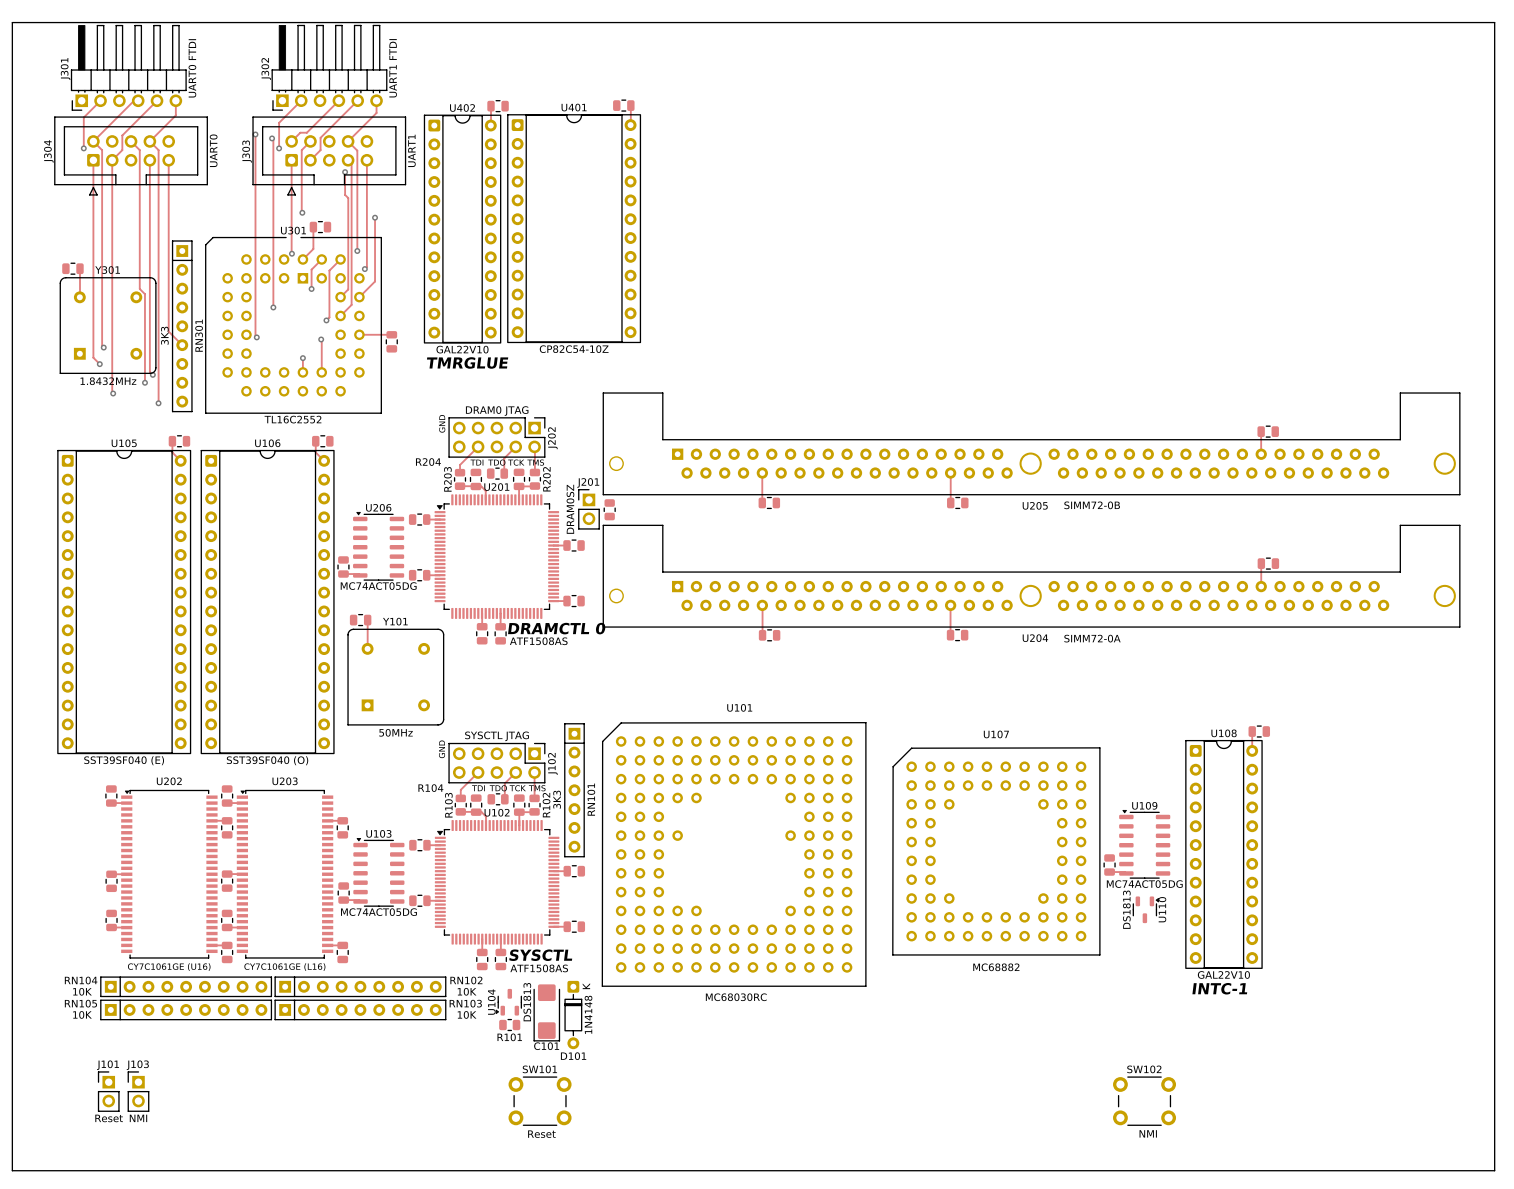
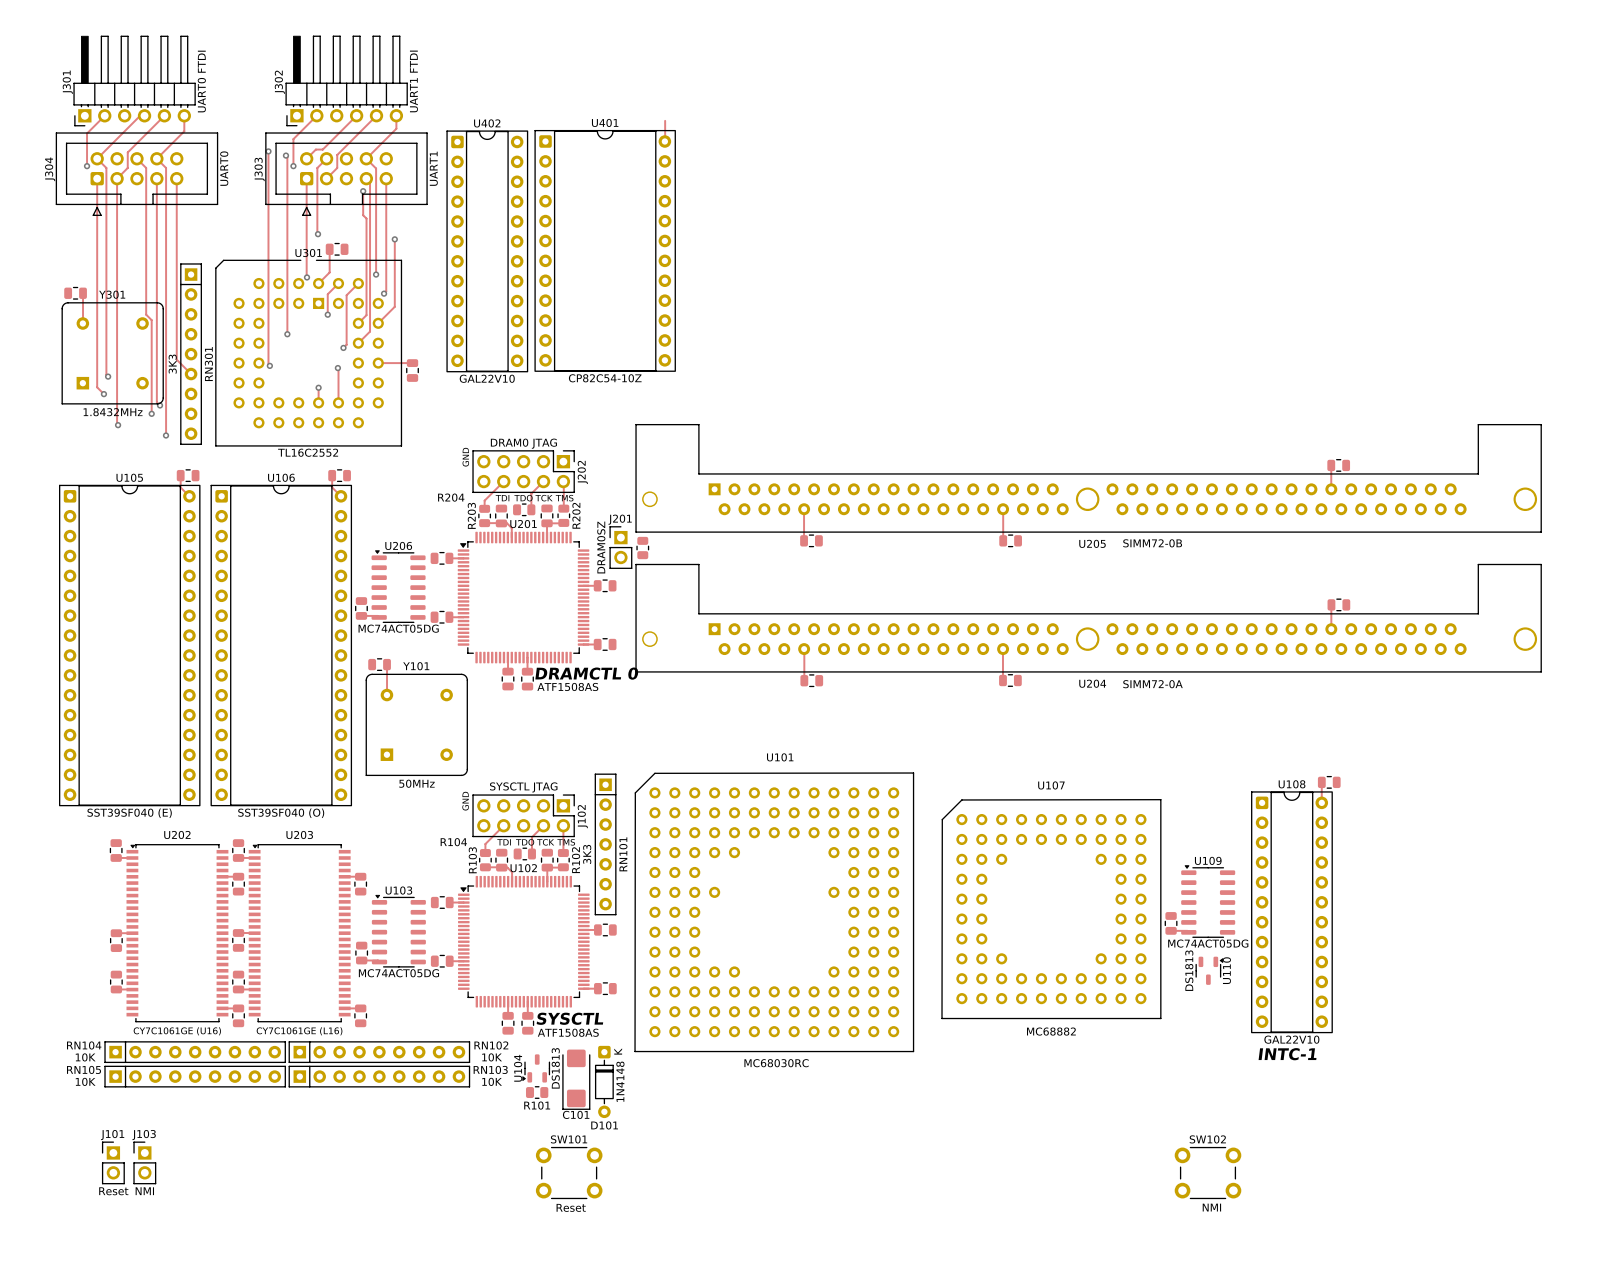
board edge: (12, 22) (1494, 22) (1494, 1170) (12, 1170) (12, 22) -> none
part: (623, 105) -> none
track: (491, 106) (490, 125) -> none
part: (498, 106) -> none
text: TMRGLUE (467, 362) -> none

